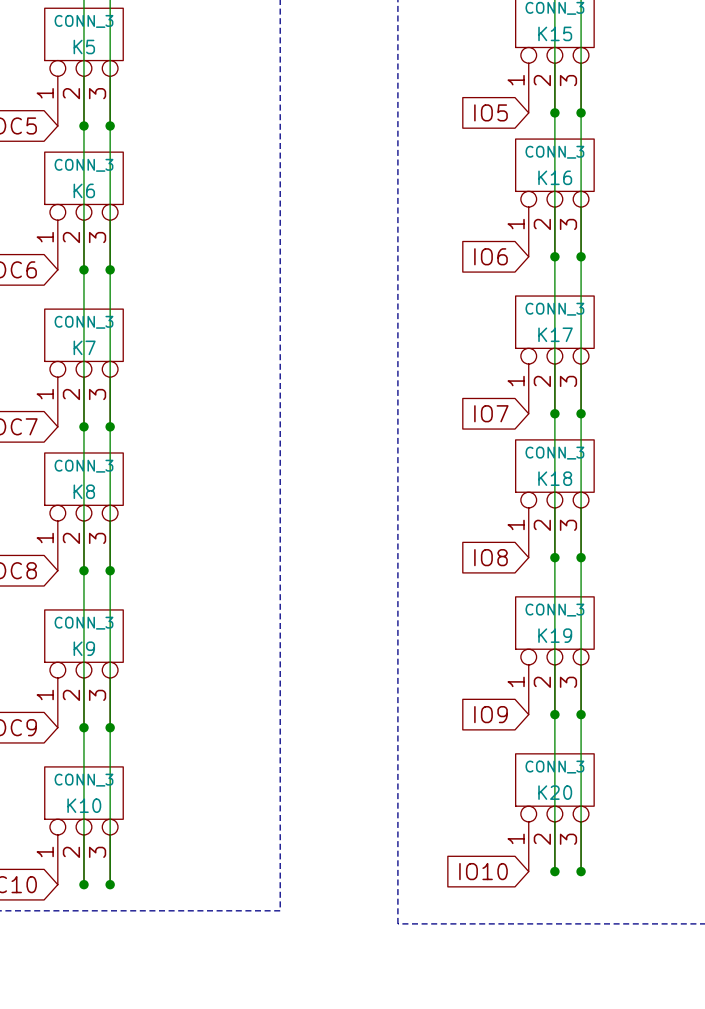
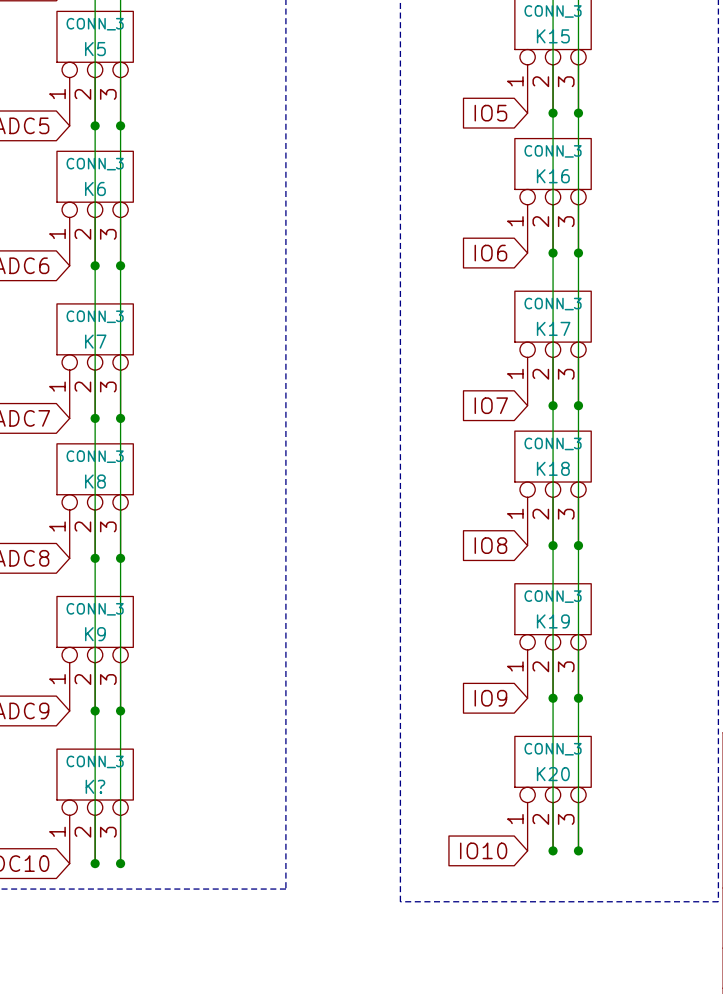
K10 name: K10 (84, 805) -> K? (95, 786)

